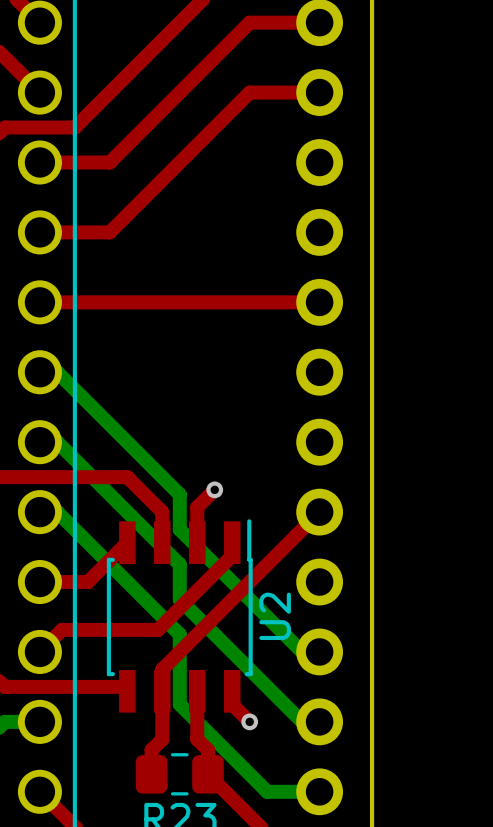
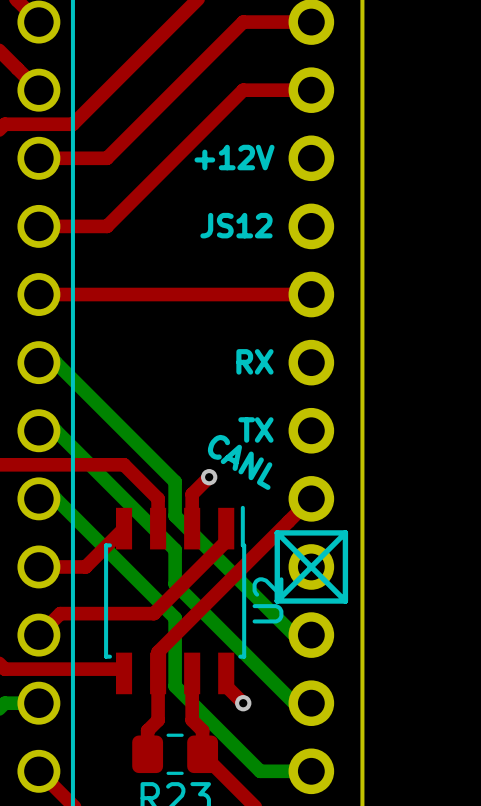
text: none -> +12V (234, 157)
text: none -> JS12 (236, 225)
text: none -> RX (254, 361)
text: none -> TX (255, 429)
text: none -> CANL (240, 462)
line: none -> (277, 532) (277, 601)
line: none -> (277, 532) (345, 532)
line: none -> (277, 532) (345, 601)
line: none -> (345, 532) (277, 601)
line: none -> (345, 532) (345, 601)
line: none -> (277, 601) (345, 601)

